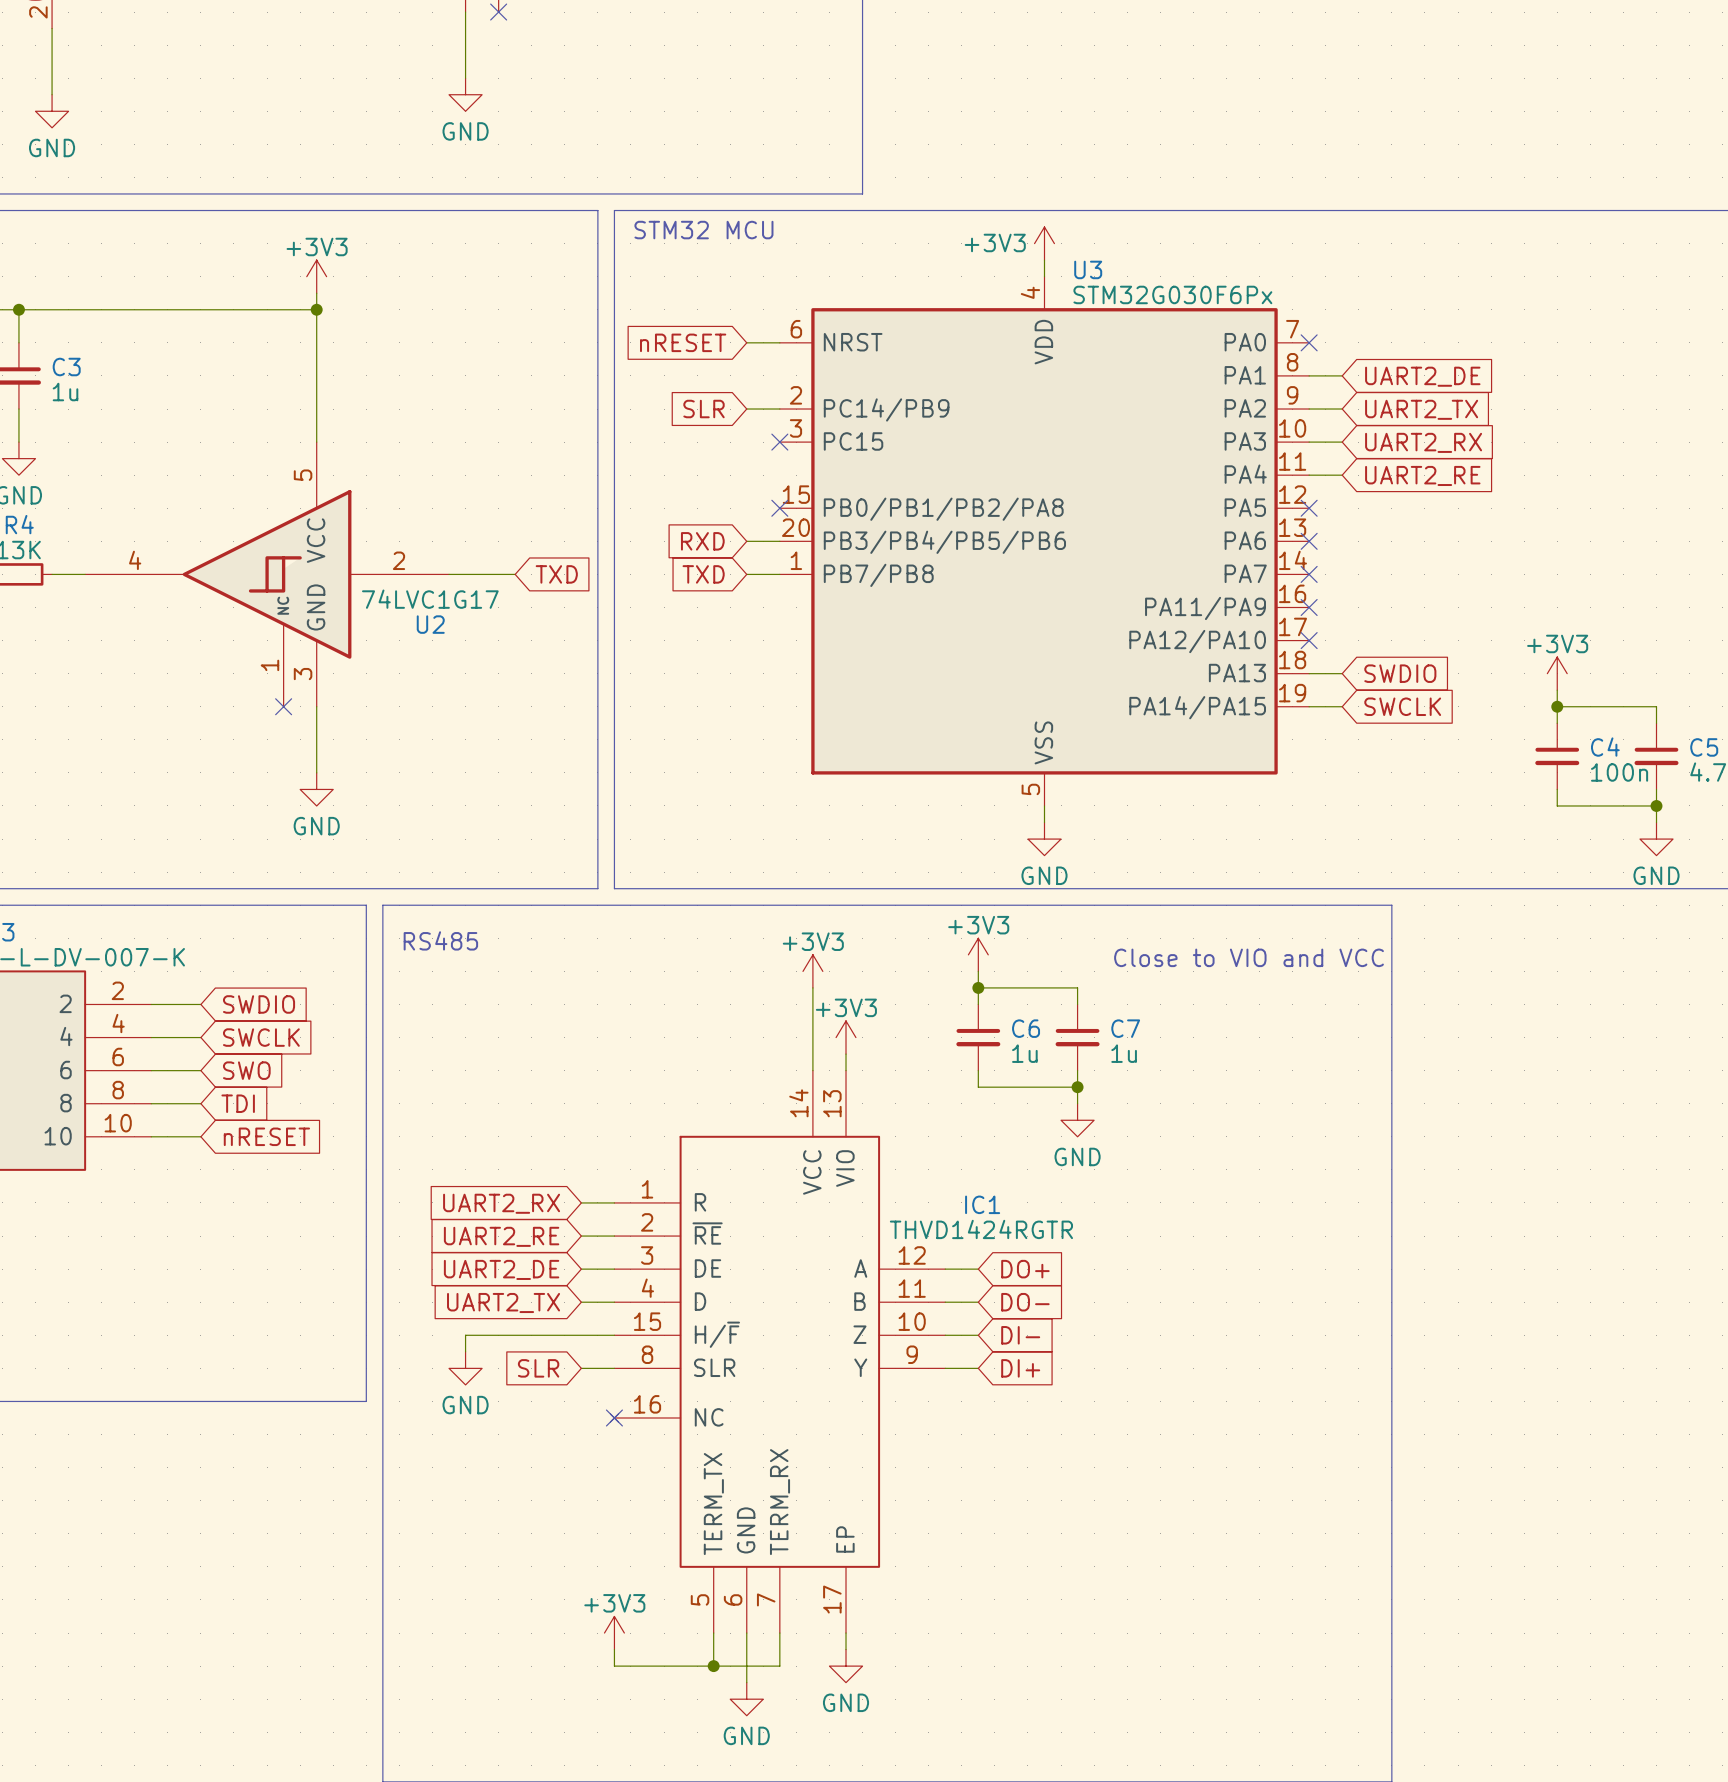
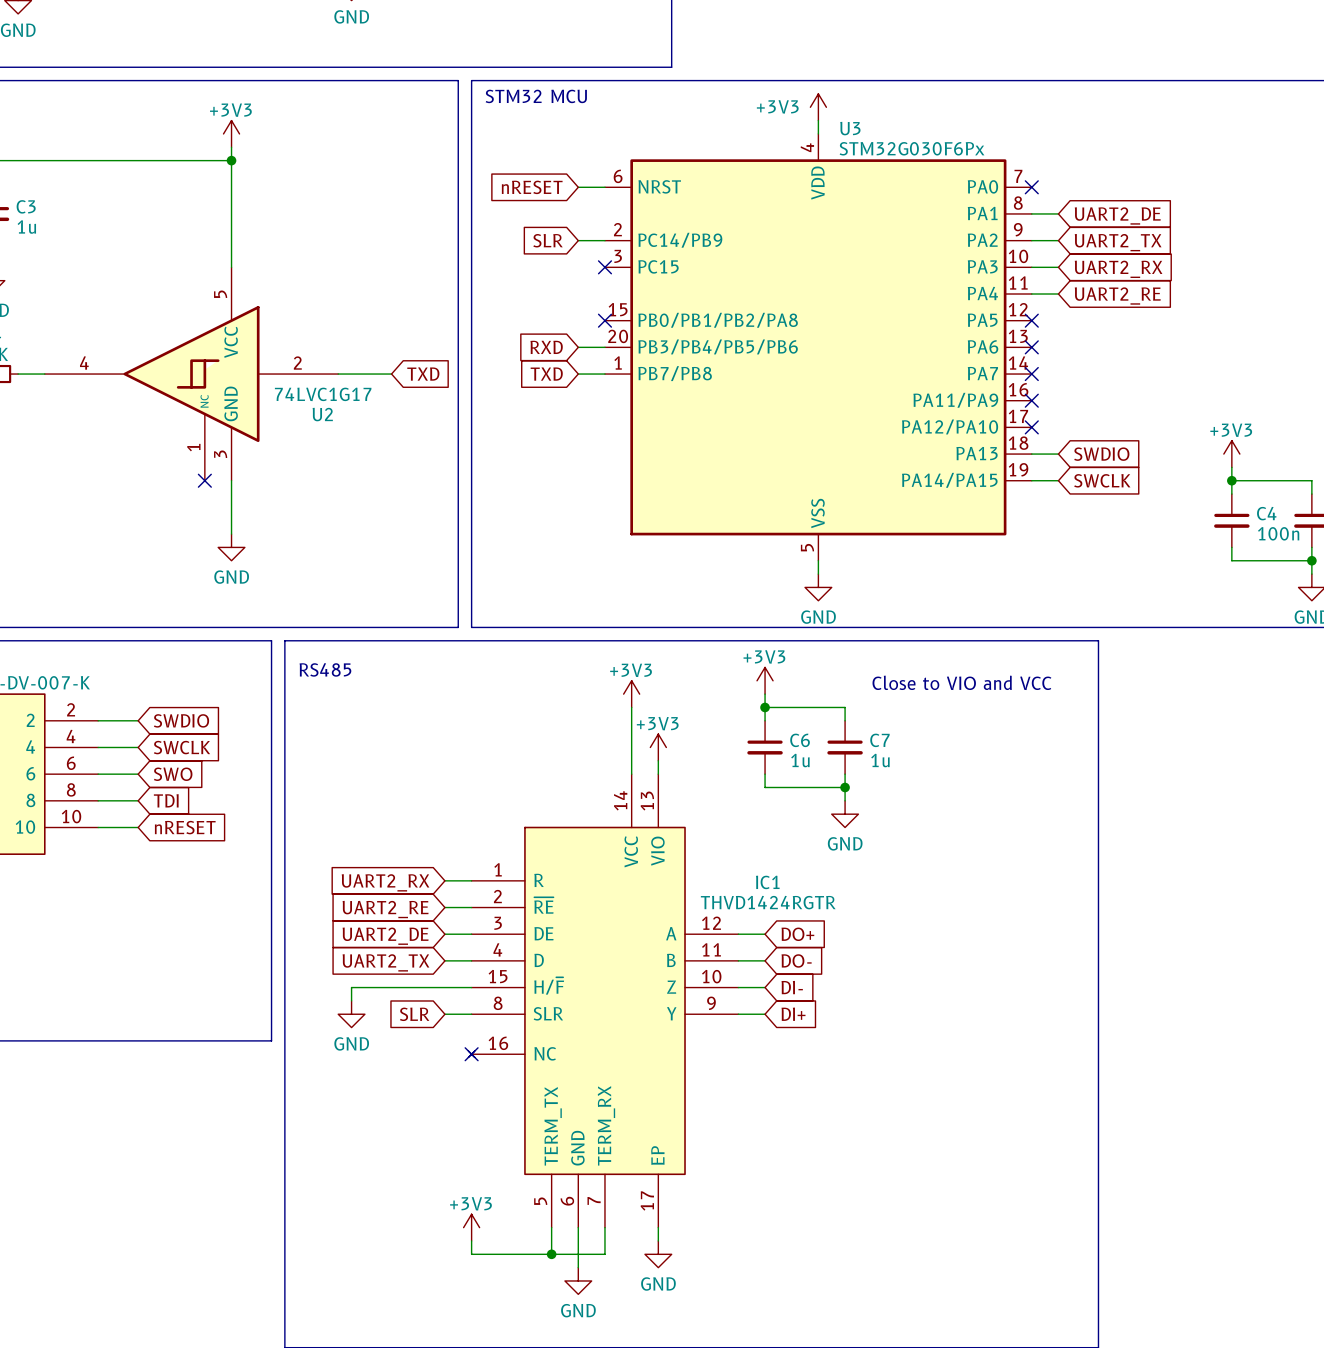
IC1 symbol: [610, 1070, 946, 1634] -> [468, 774, 739, 1228]

